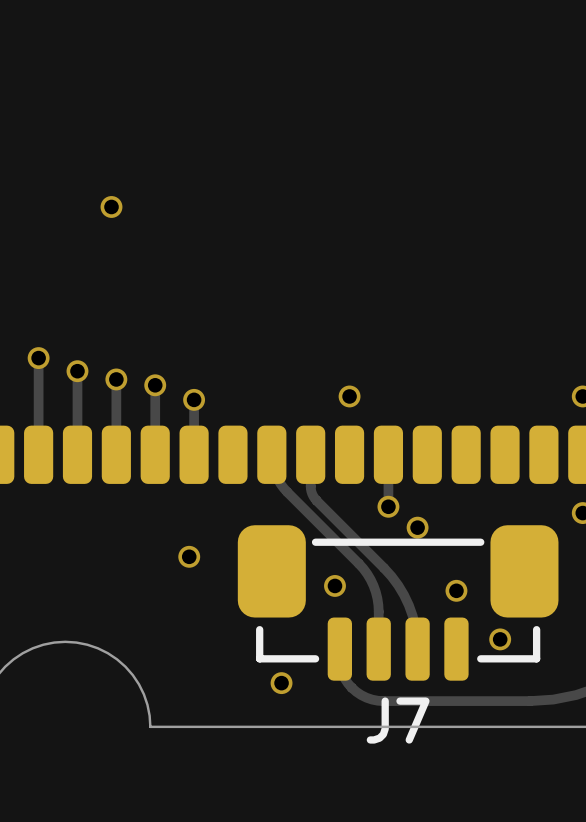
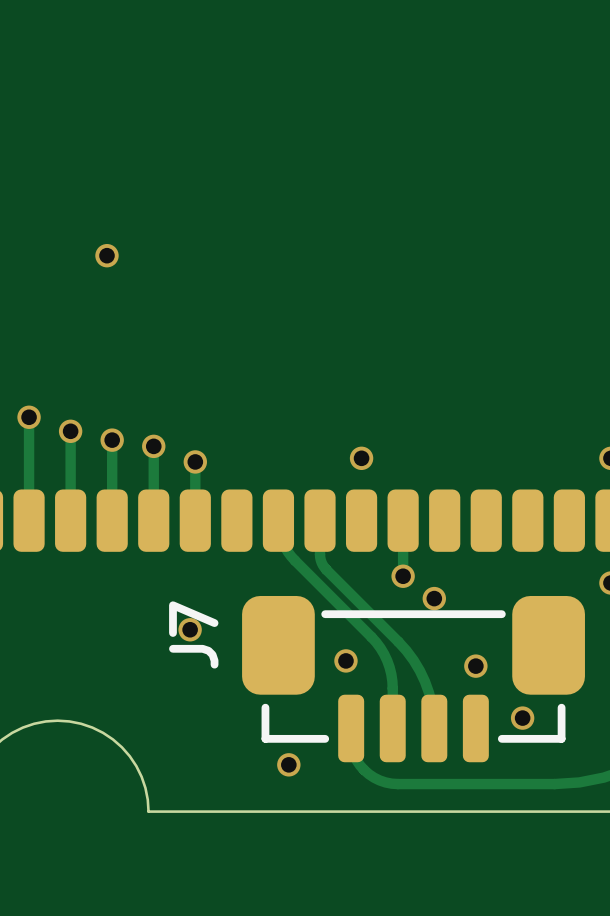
J7 name rotation: 0° (398, 720) -> 90° counterclockwise (193, 634)
J7 name position: J7 (398, 720) -> J7 (193, 634)

